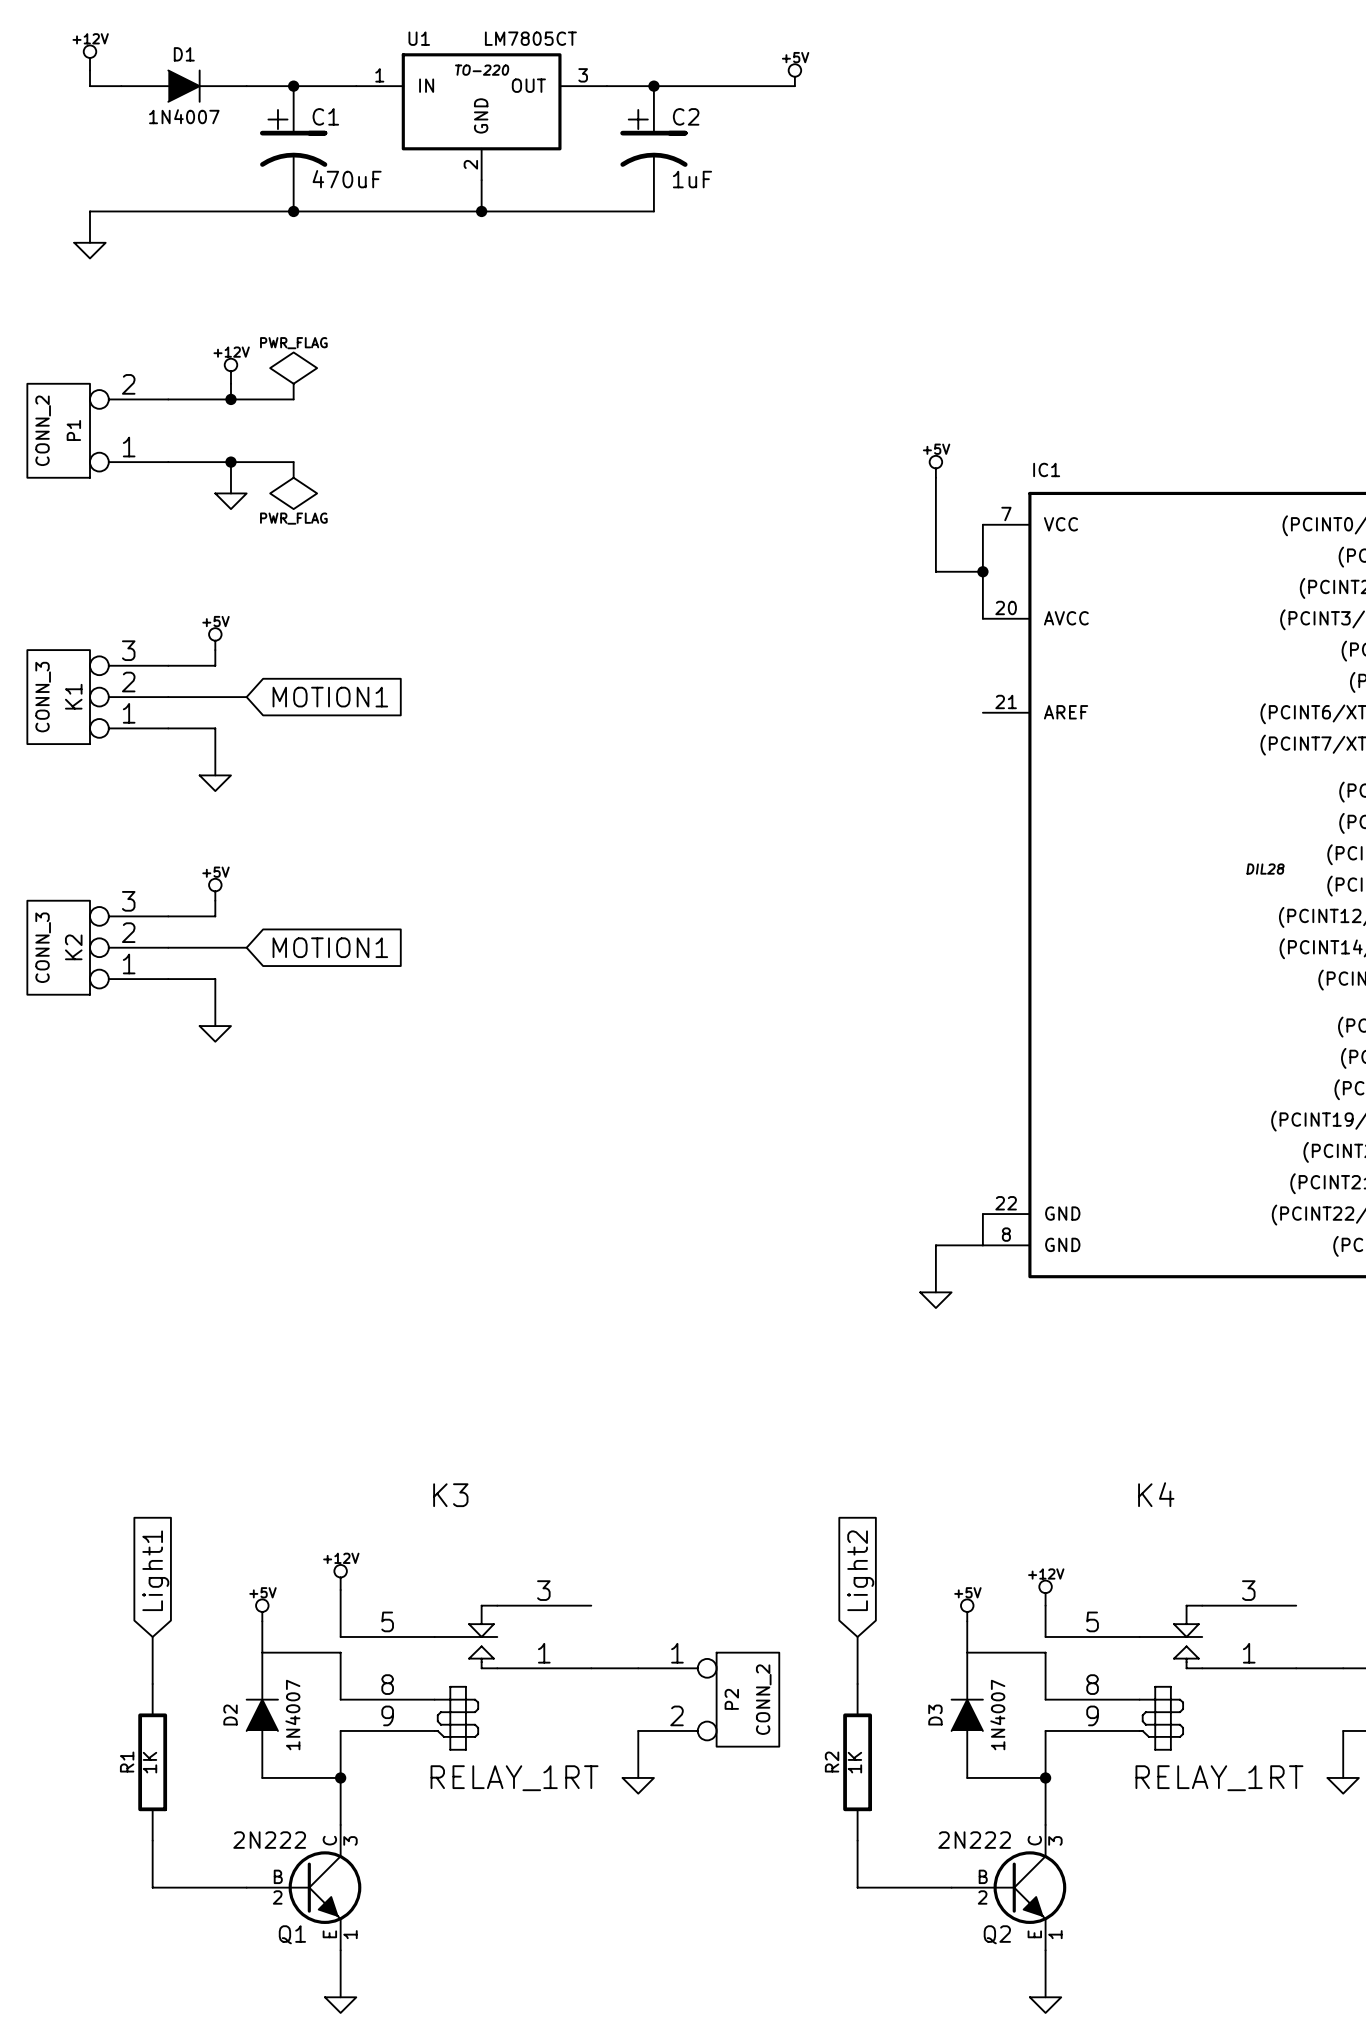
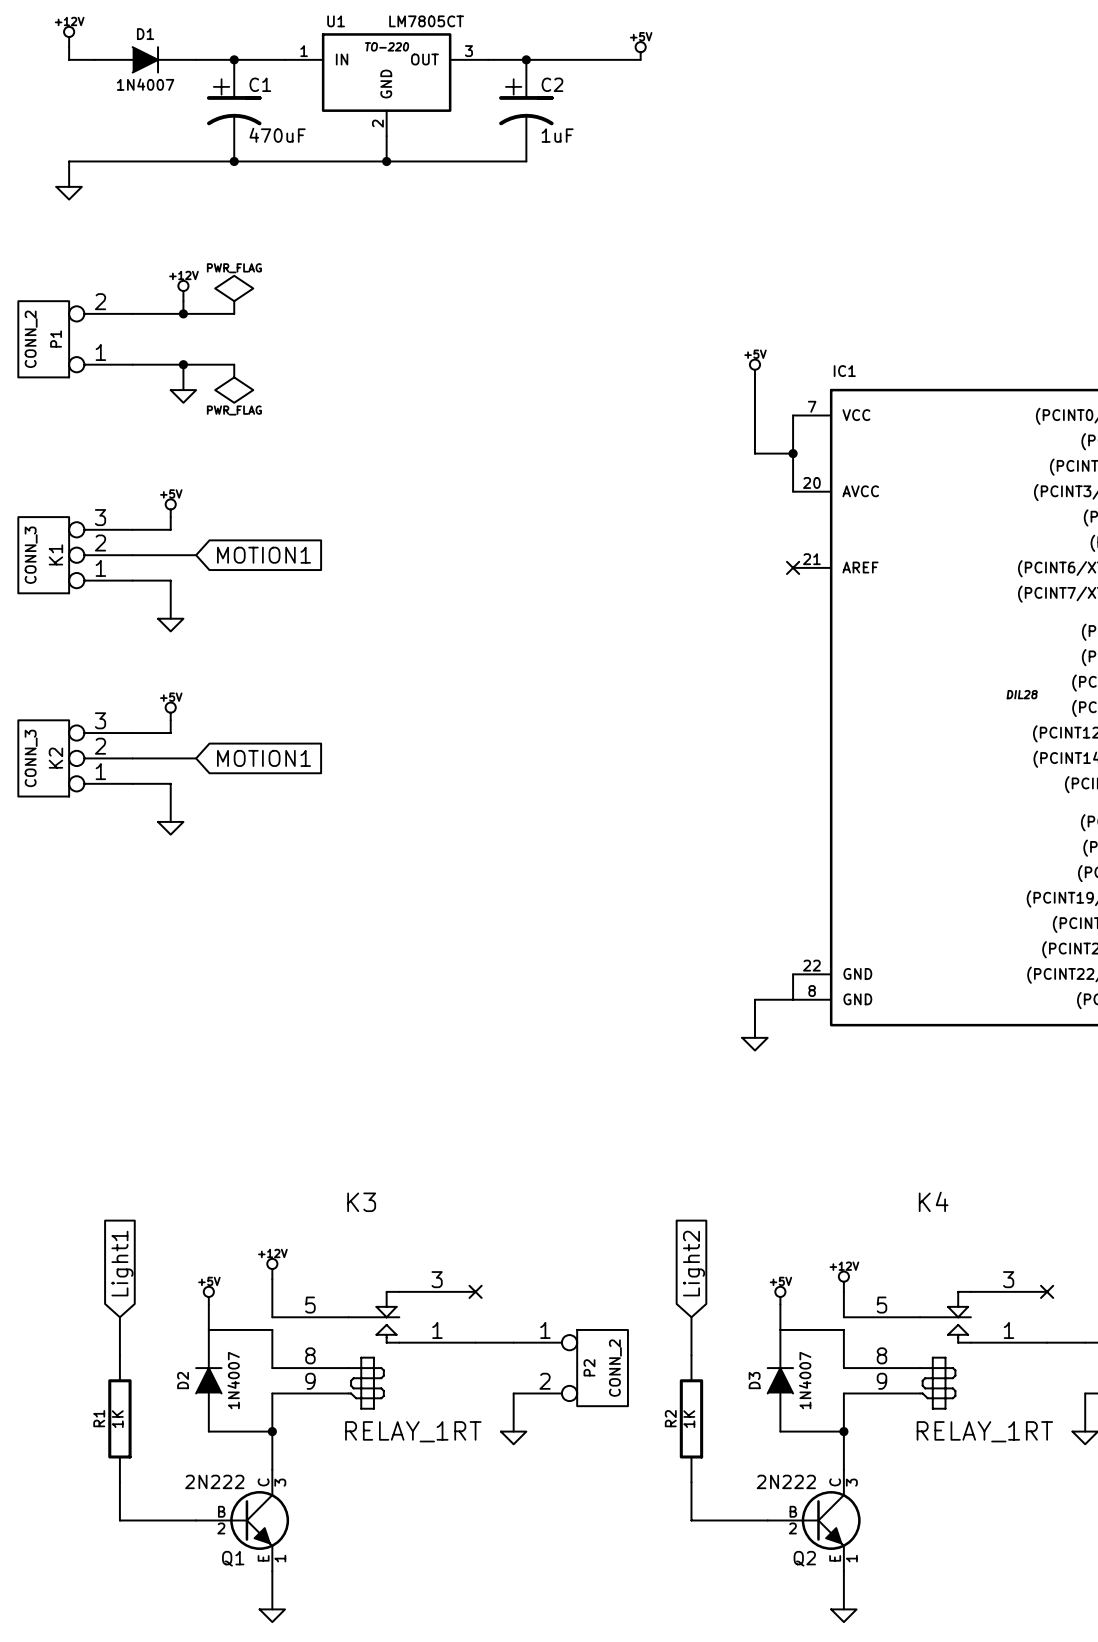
no-connect mark: none -> (793, 567)
no-connect mark: none -> (475, 1291)
no-connect mark: none -> (1047, 1291)

